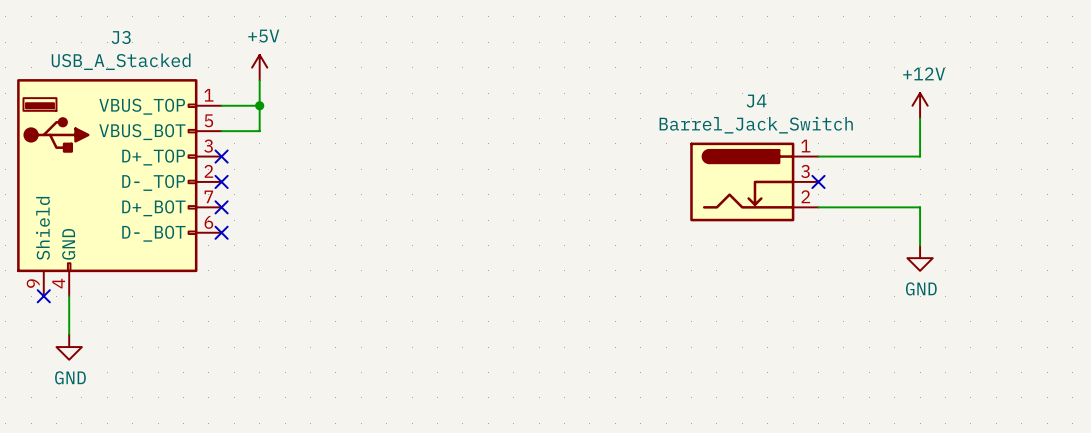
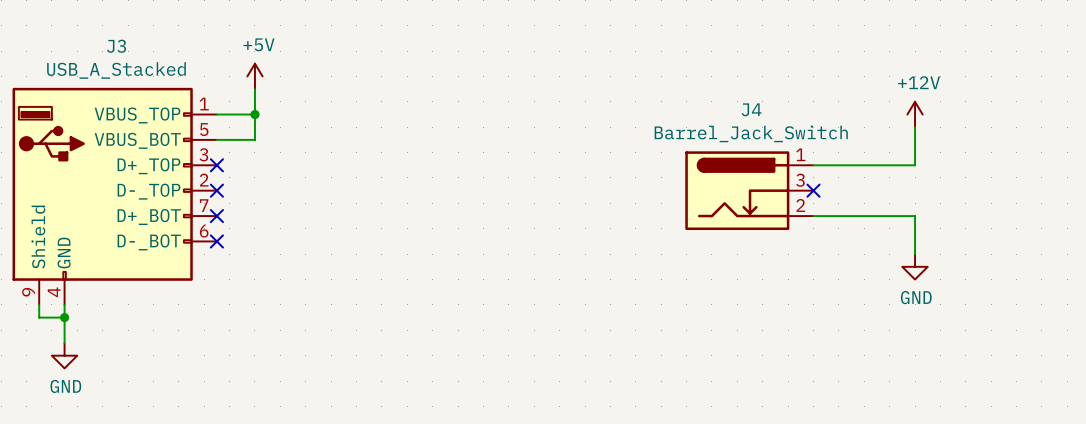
wire: none -> (39, 304) (39, 317) (64, 317)
no-connect mark: (43, 296) -> none
junction: none -> (64, 317)

